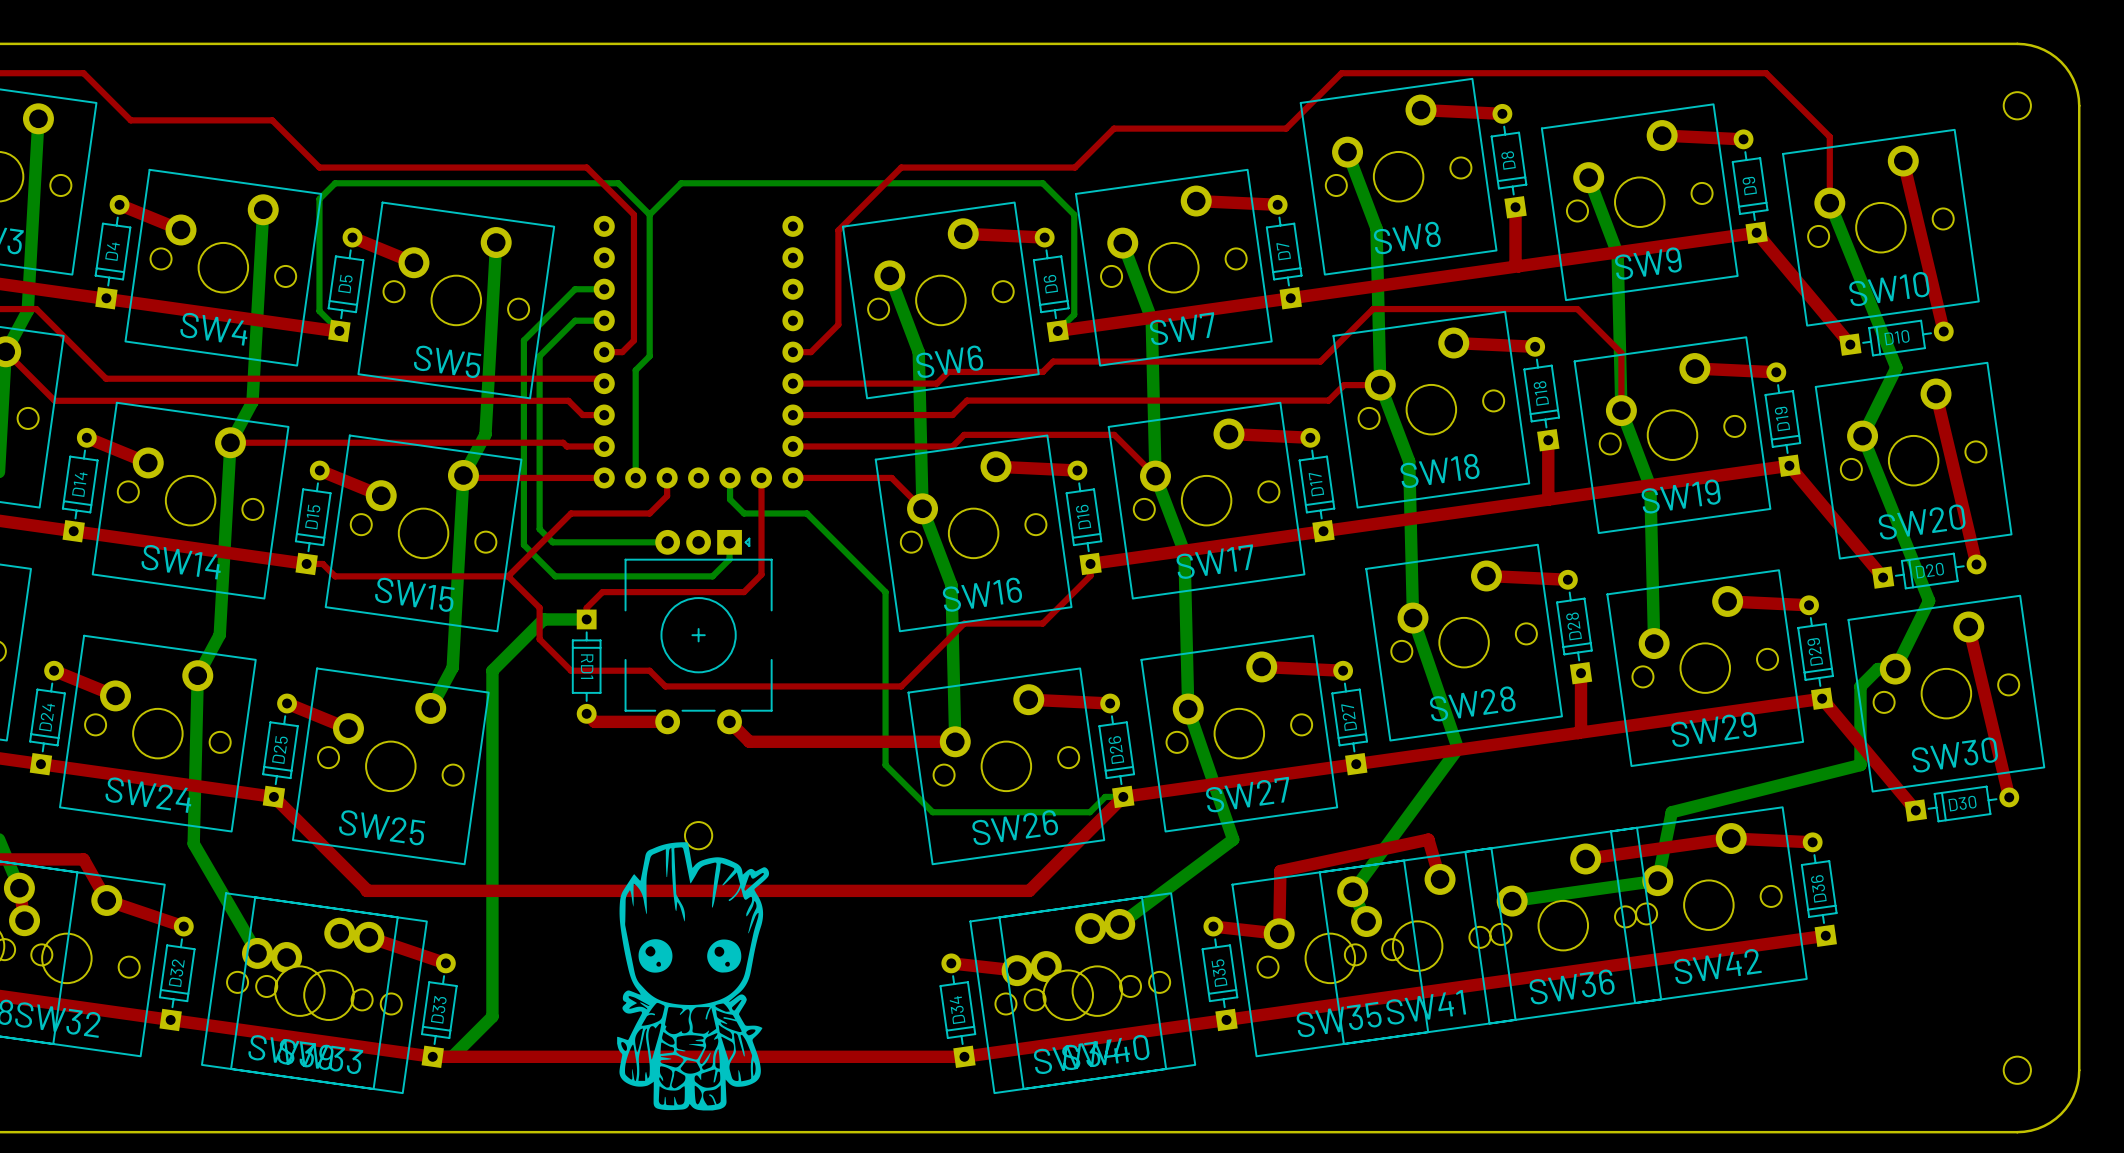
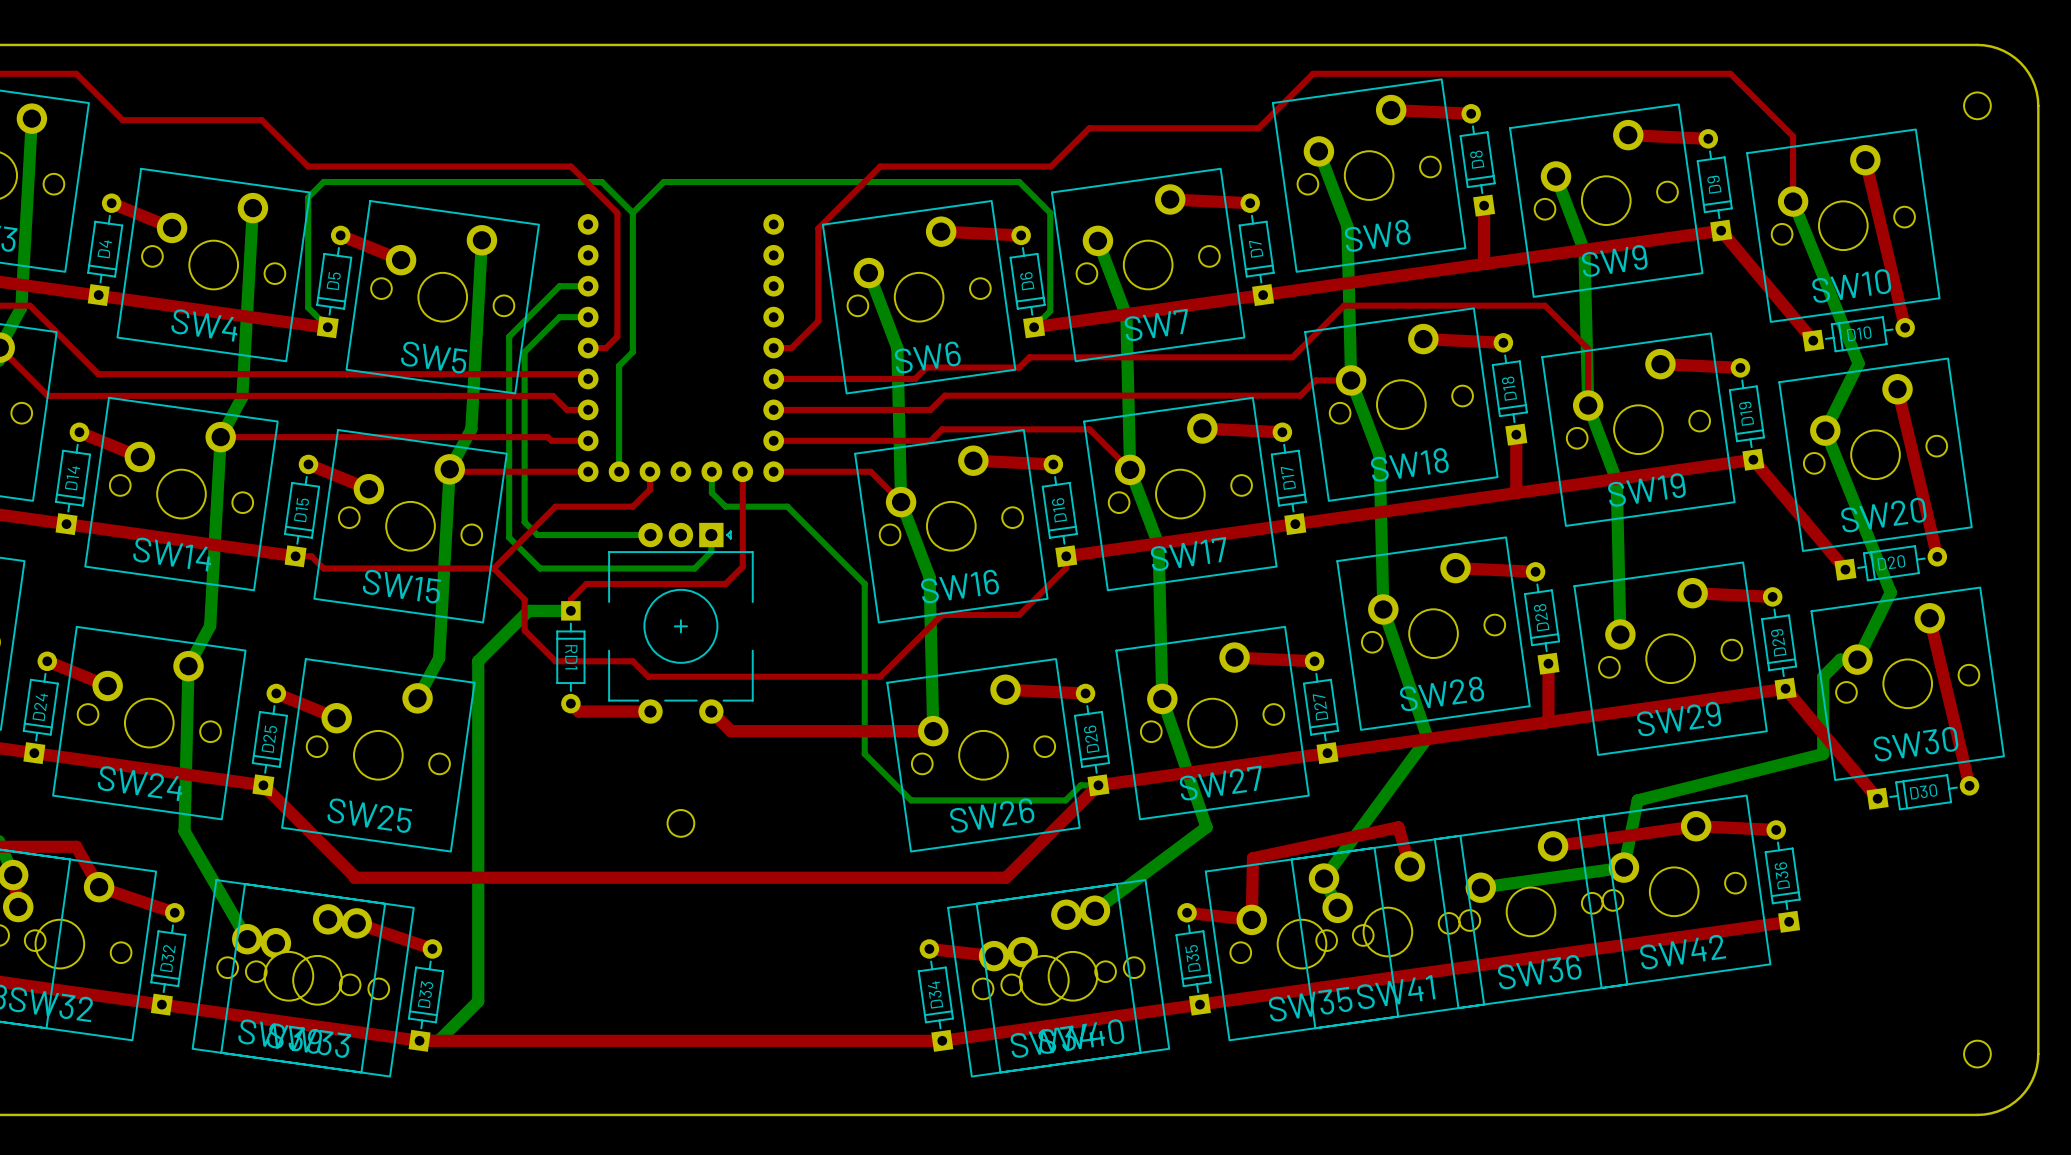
drawing: [617, 842, 770, 1111] -> none

